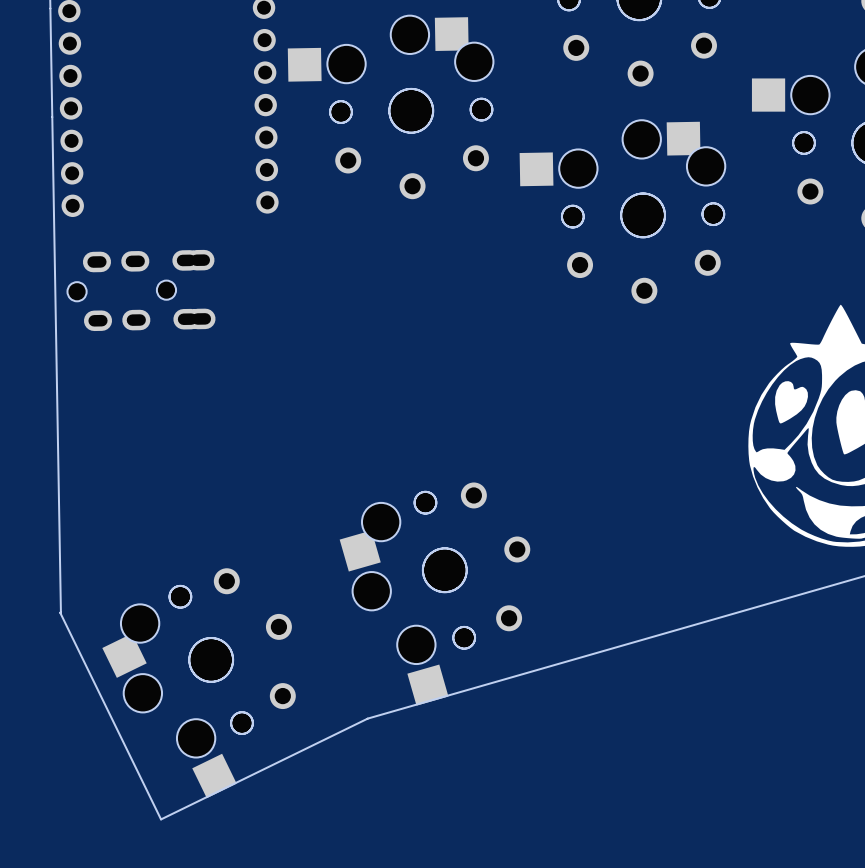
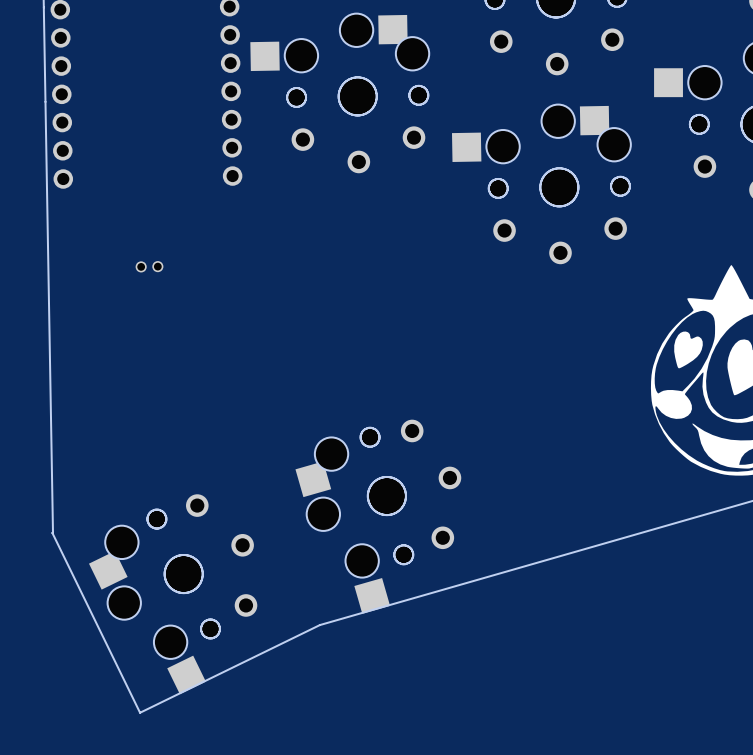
part: (141, 290) -> none
part: none -> (149, 266)

